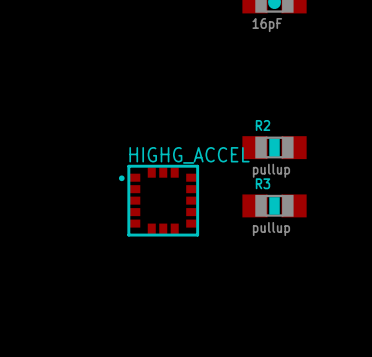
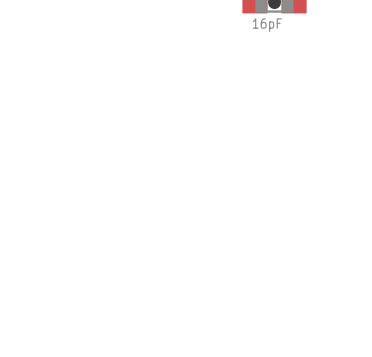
R2: pullup (274, 147) -> none
HIGHG_ACCEL: (159, 200) -> none
R3: pullup (274, 205) -> none

